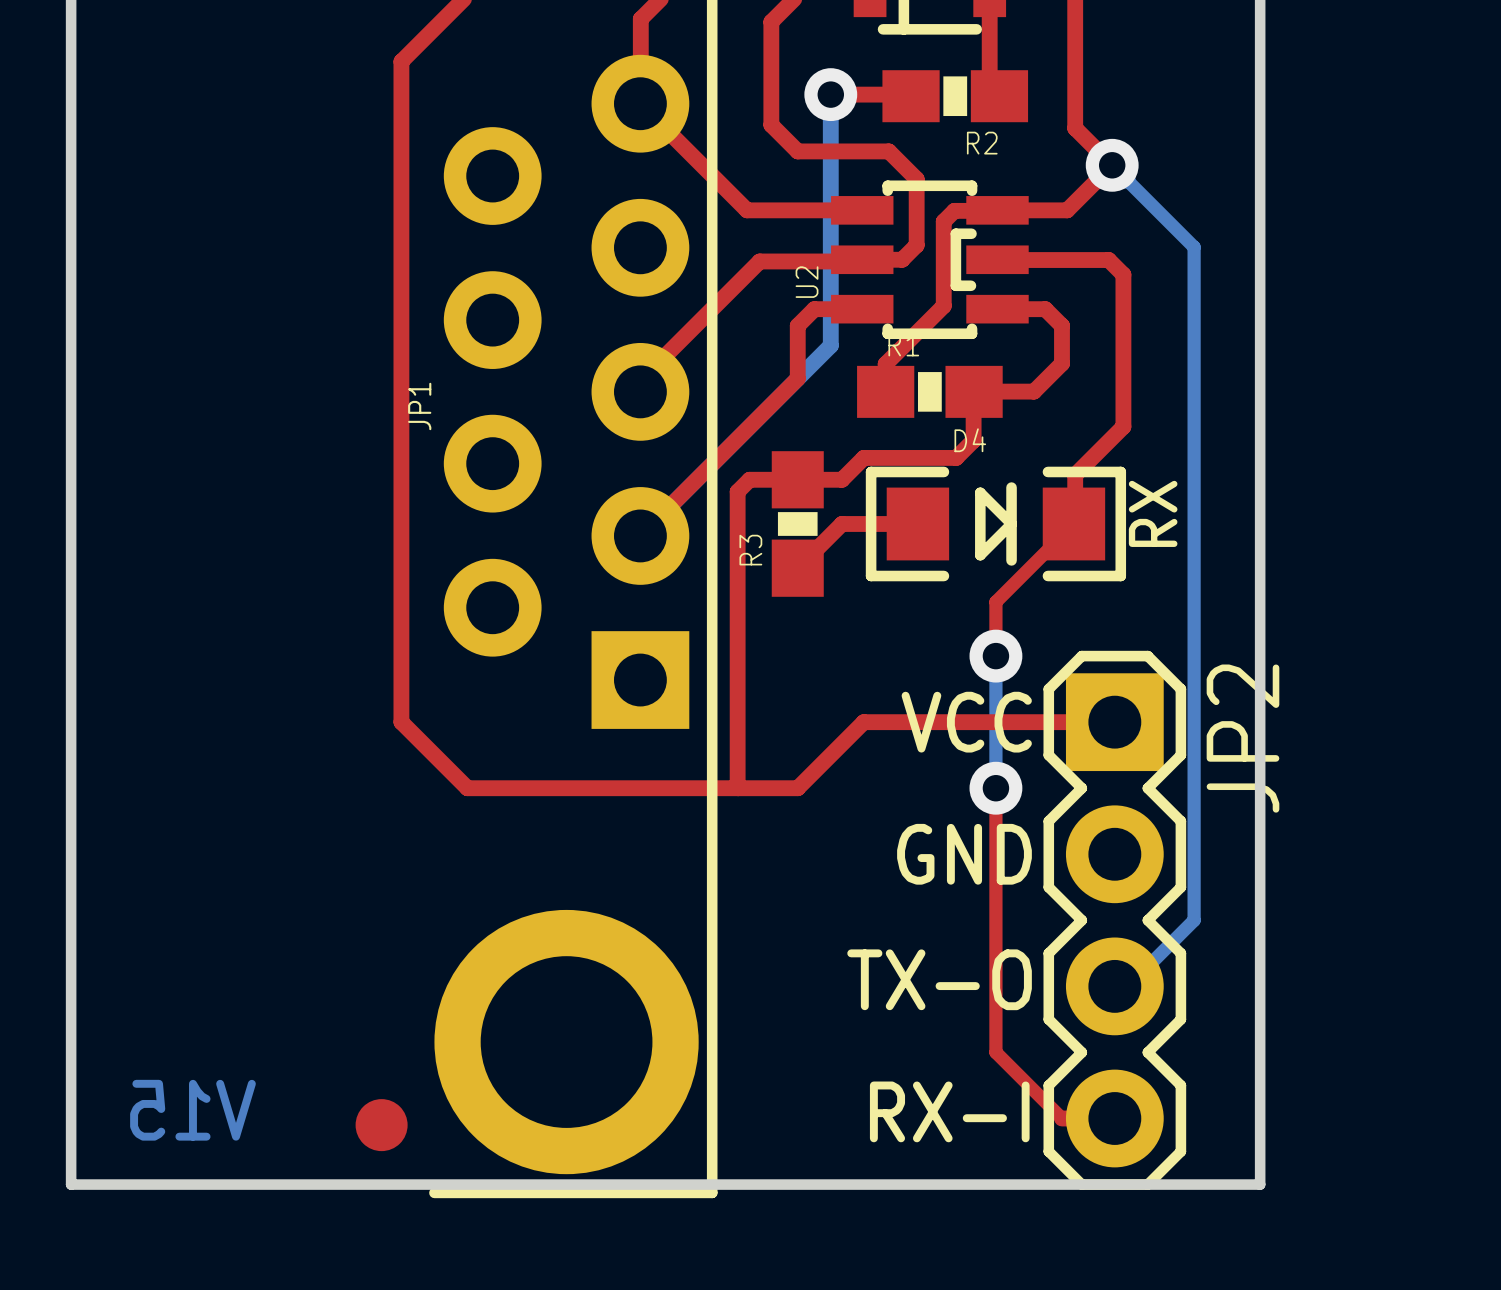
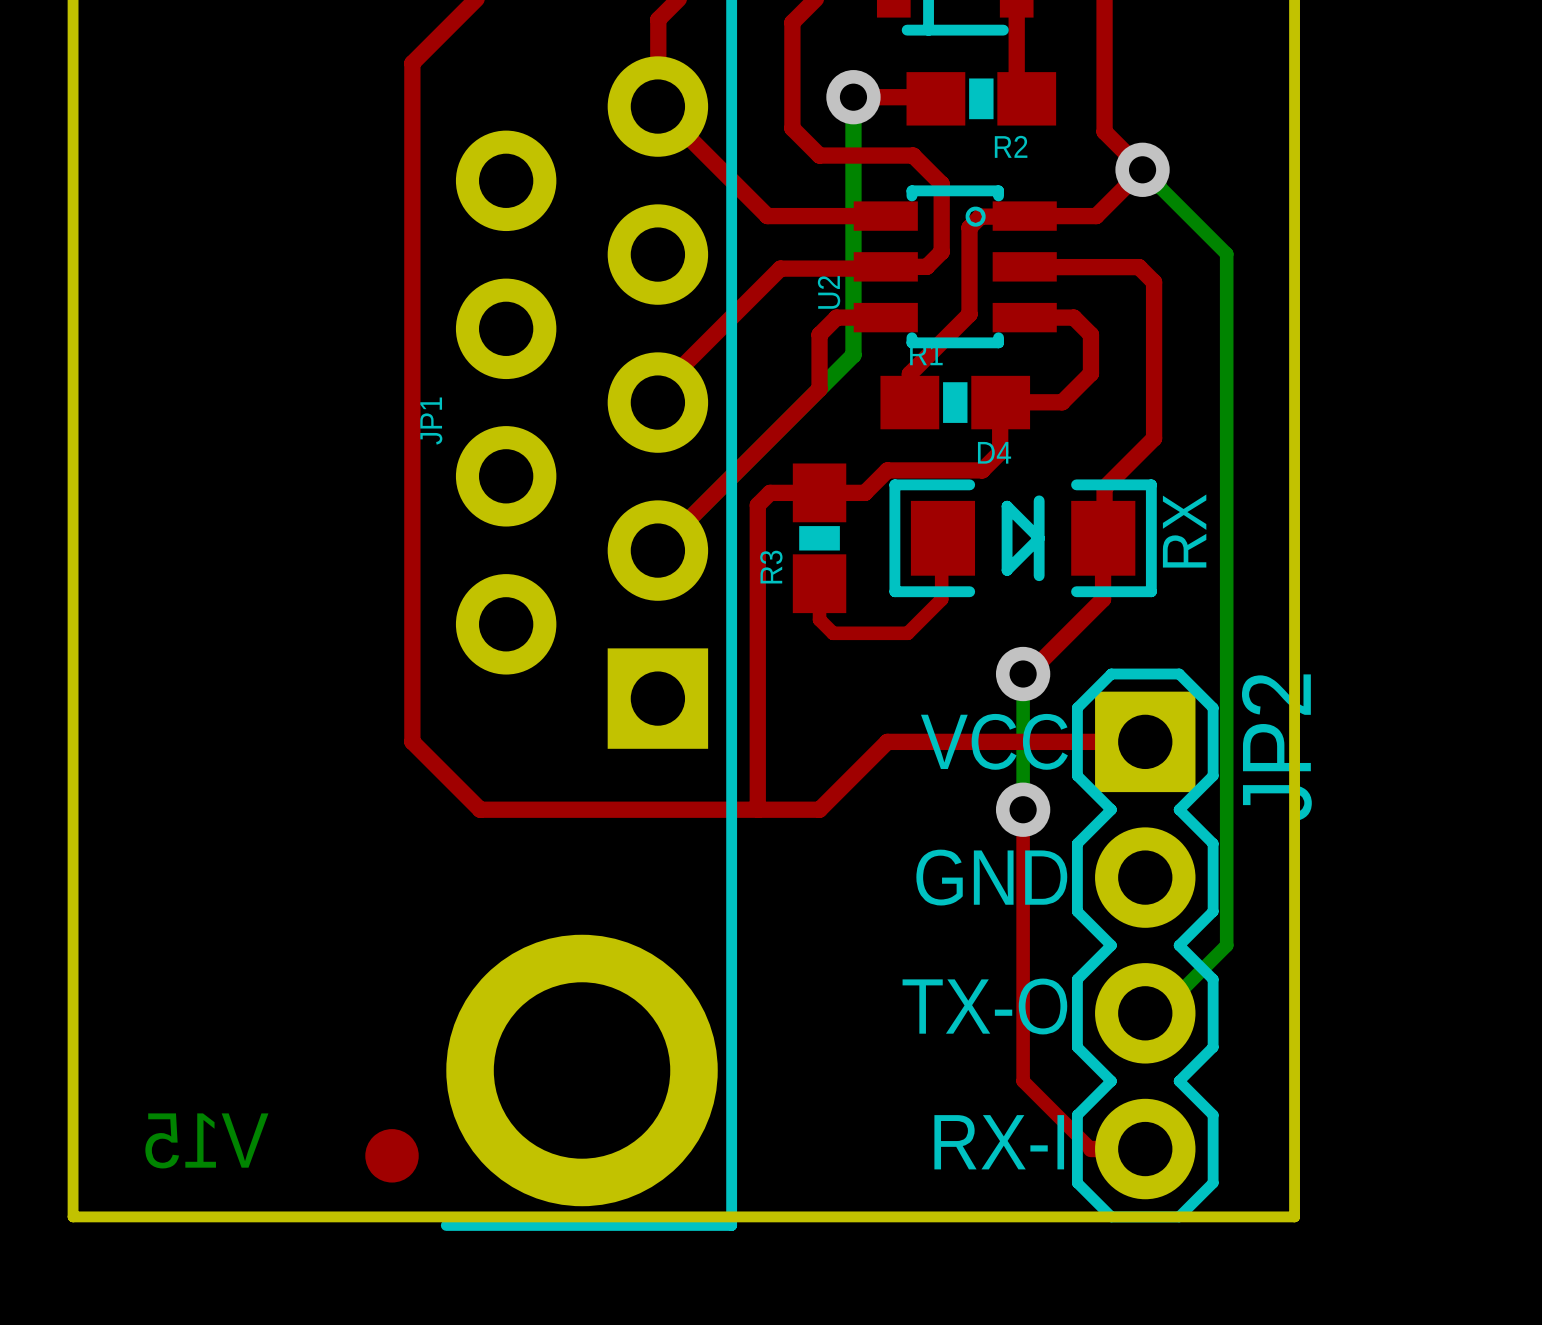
U2 footprint: [831, 180, 1029, 340] -> [853, 185, 1057, 349]
top track: (917, 523) (841, 523) (797, 568) -> (942, 538) (941, 599) (907, 633) (833, 633) (819, 619) (819, 583)
top track: (1073, 524) (995, 602) (995, 656) -> (1103, 538) (1103, 599) (1028, 674) (1023, 674)

